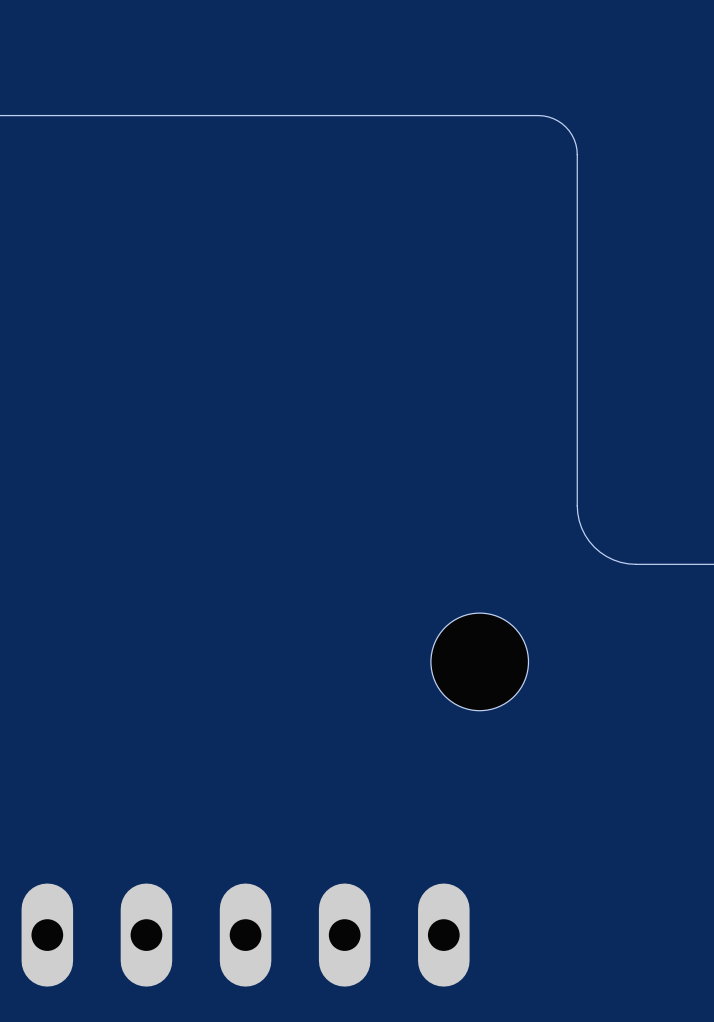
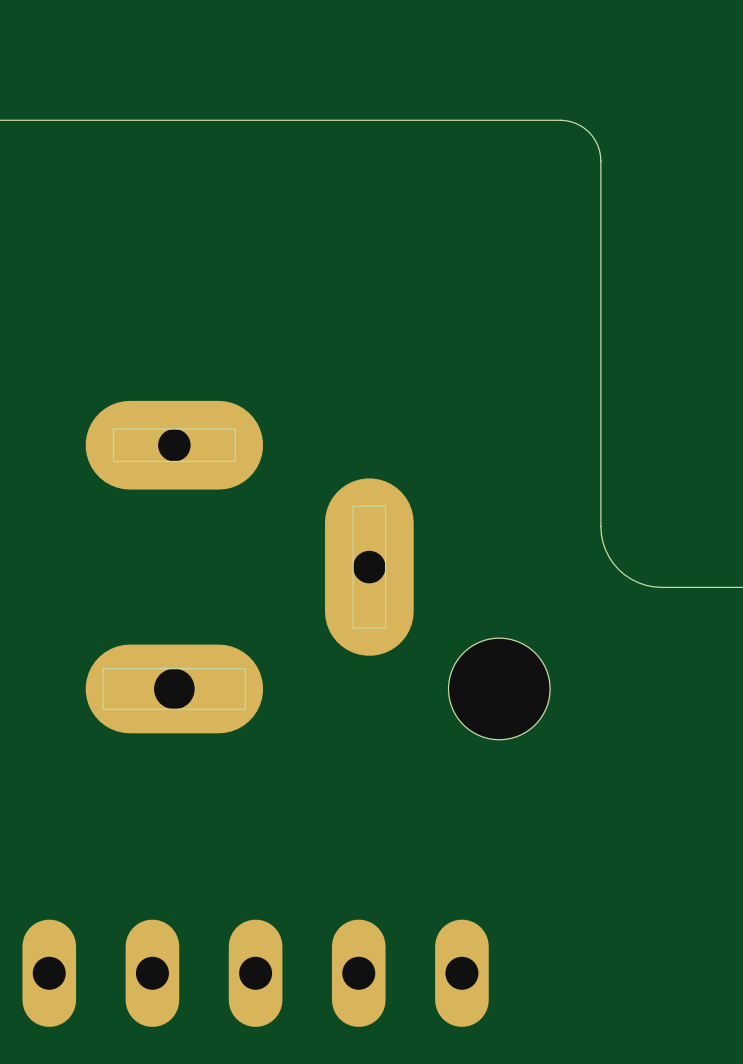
part: none -> (249, 567)

